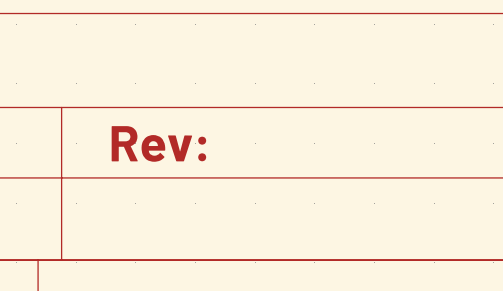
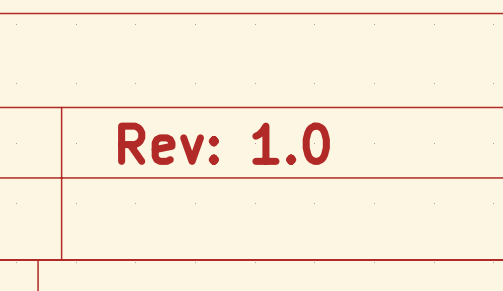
title block: Rev: (158, 143) -> Rev: 1.0 (223, 143)

